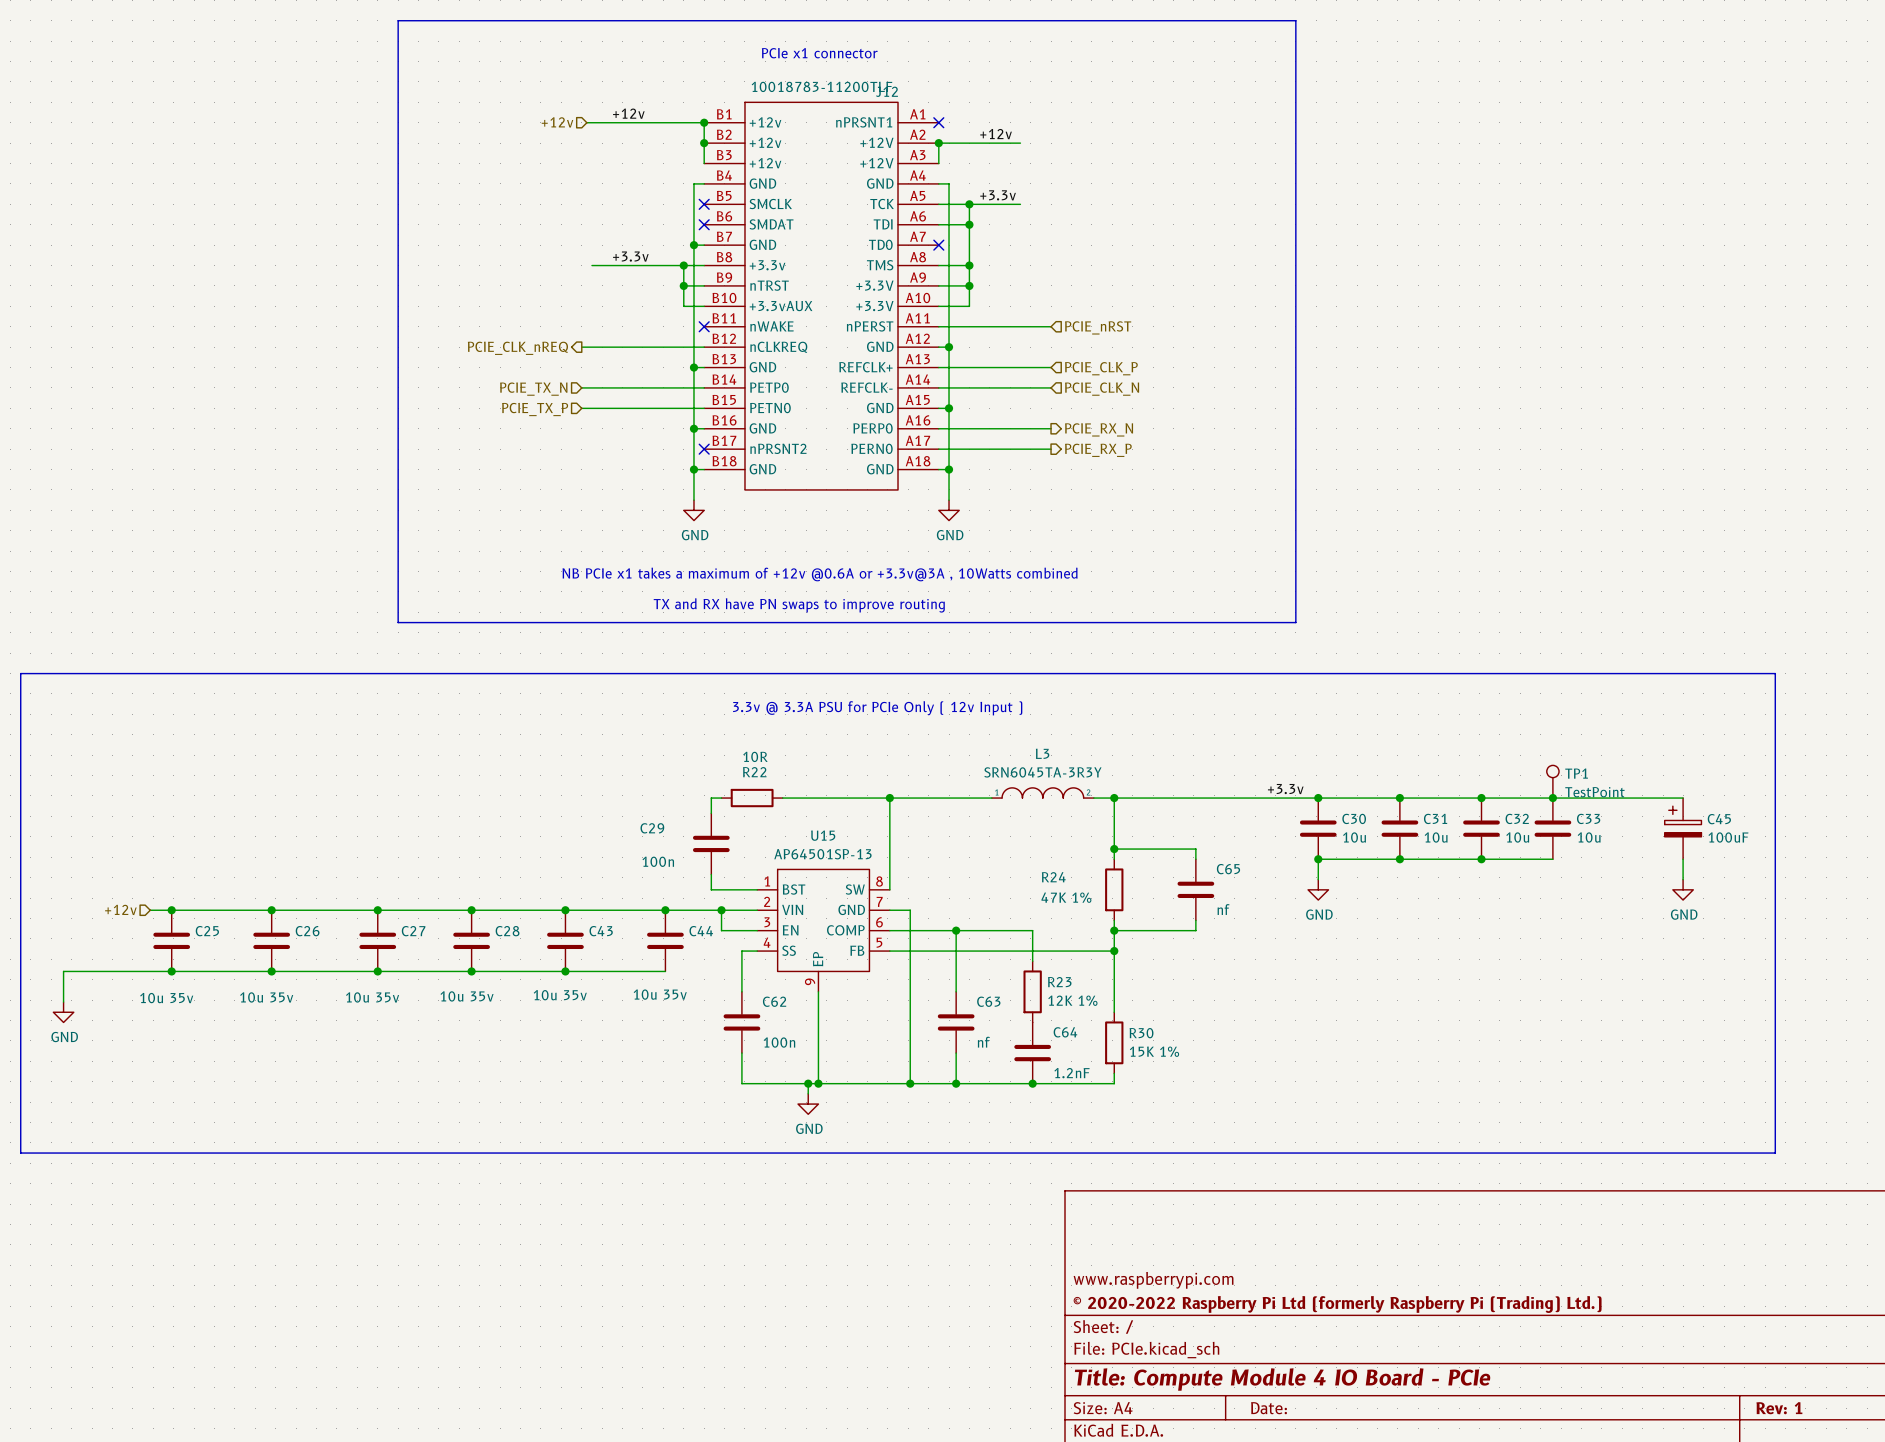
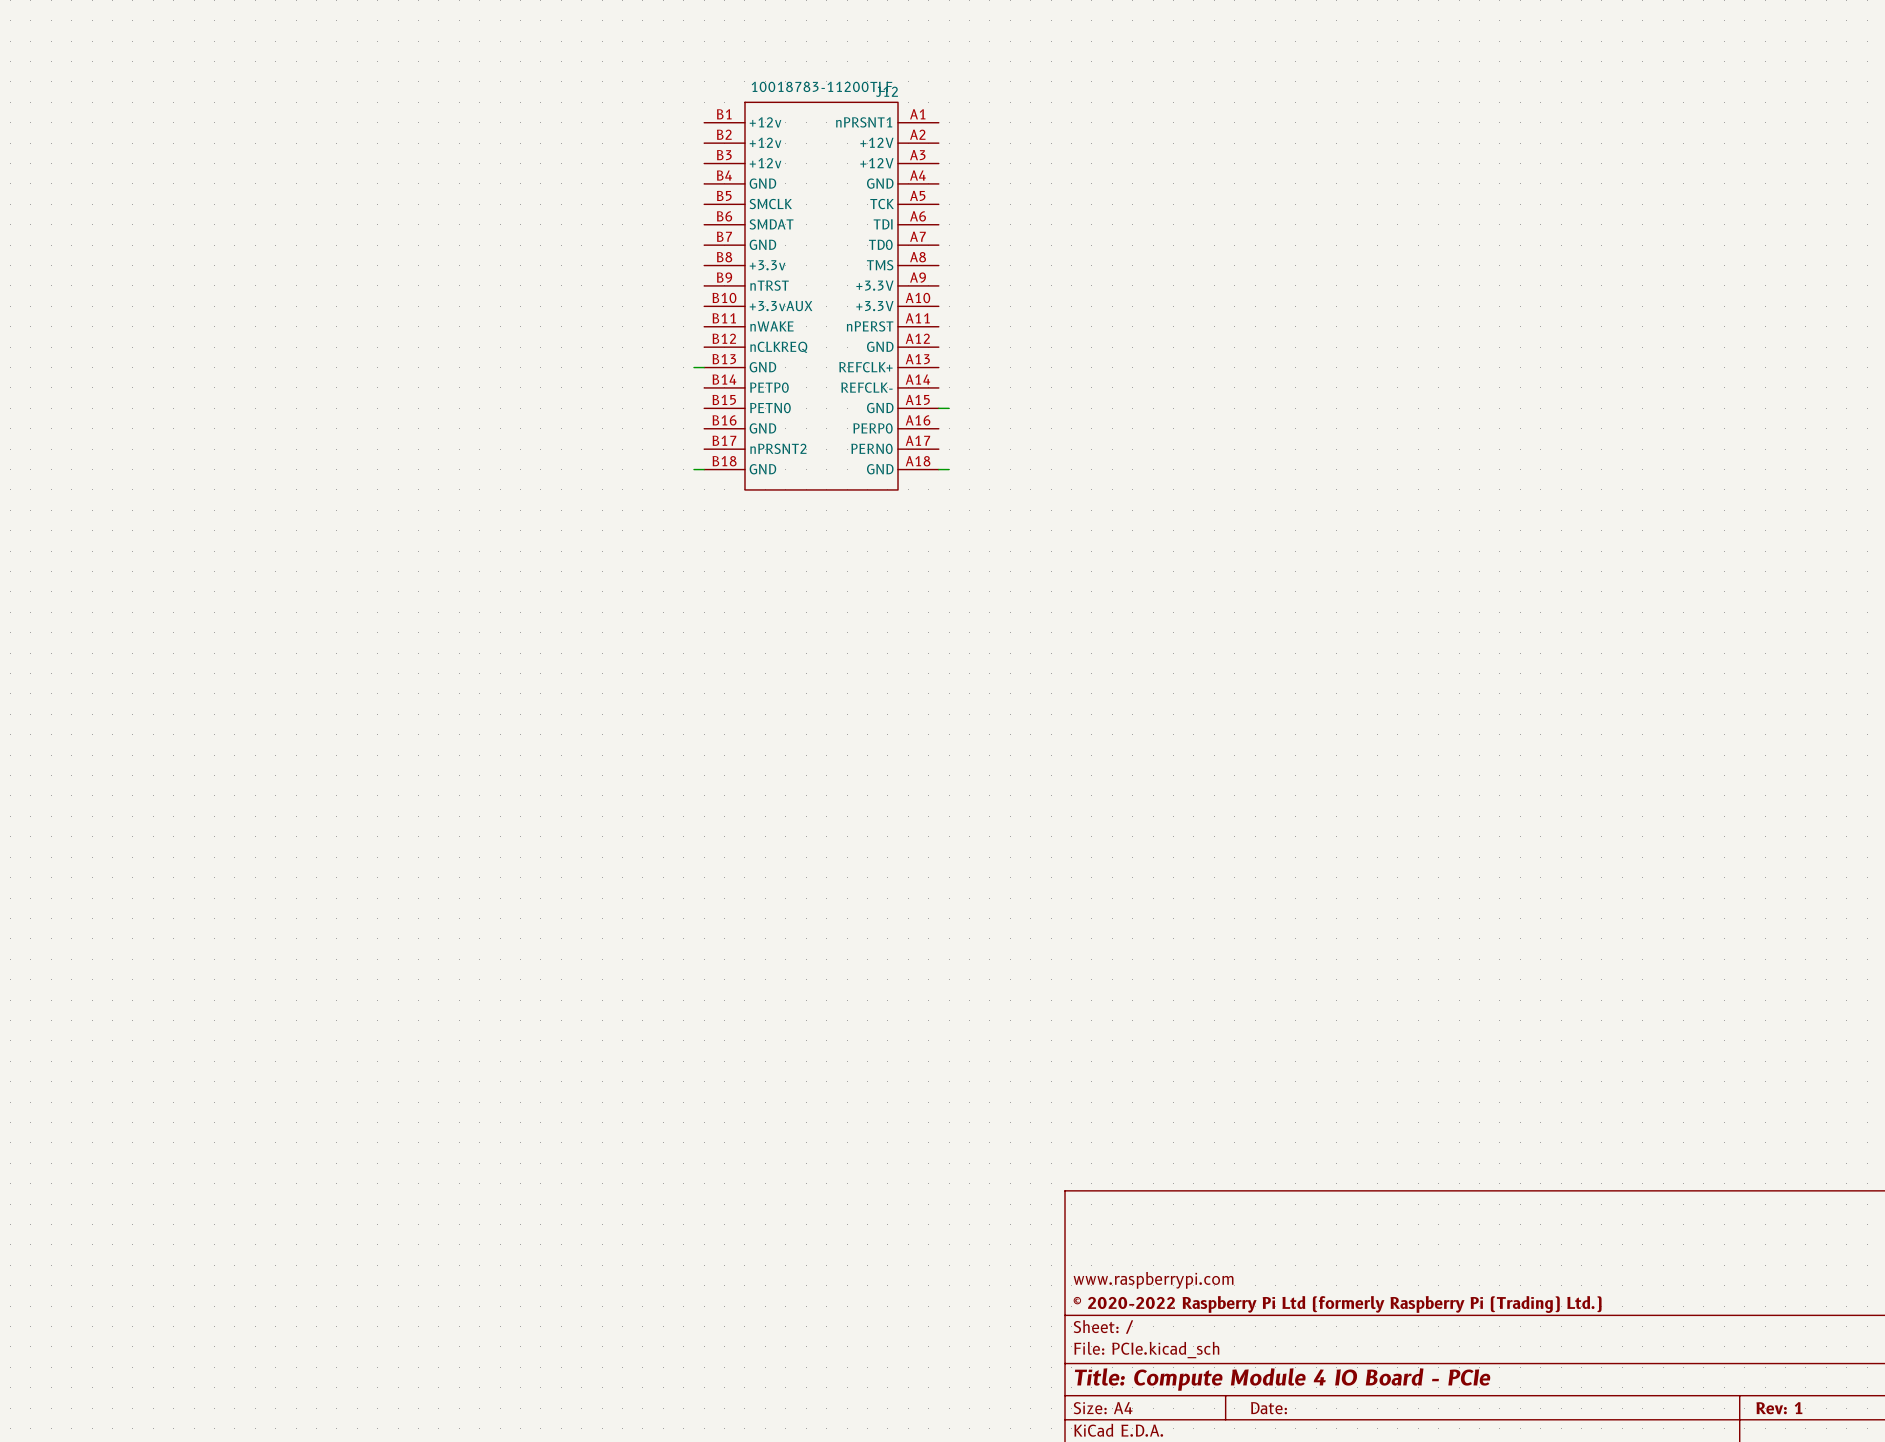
line: (398, 20) (398, 622) (1295, 622) (1295, 20) (398, 20) -> none
text: PCIe x1 connector (819, 53) -> none
label: +12v (628, 113) -> none
hierarchical label: +12v (557, 122) -> none
wire: (586, 122) (704, 122) (704, 163) -> none
junction: (704, 122) -> none
no-connect mark: (938, 122) -> none
label: +12v (996, 134) -> none
junction: (704, 143) -> none
junction: (938, 143) -> none
wire: (1020, 143) (938, 143) (938, 163) -> none
wire: (704, 183) (693, 183) (693, 500) -> none
wire: (938, 183) (949, 183) (949, 500) -> none
label: +3.3v (998, 195) -> none
no-connect mark: (704, 204) -> none
wire: (938, 204) (1020, 204) -> none
wire: (969, 204) (969, 306) (938, 306) -> none
junction: (969, 204) -> none
no-connect mark: (704, 224) -> none
wire: (938, 224) (969, 224) -> none
junction: (969, 224) -> none
wire: (693, 245) (704, 245) -> none
junction: (693, 245) -> none
no-connect mark: (938, 245) -> none
label: +3.3v (630, 256) -> none
wire: (591, 265) (704, 265) -> none
wire: (683, 265) (683, 306) (704, 306) -> none
junction: (683, 265) -> none
wire: (938, 265) (969, 265) -> none
junction: (969, 265) -> none
wire: (683, 285) (704, 285) -> none
junction: (683, 285) -> none
wire: (938, 285) (969, 285) -> none
junction: (969, 285) -> none
no-connect mark: (704, 326) -> none
wire: (938, 326) (1051, 326) -> none
hierarchical label: PCIE_nRST (1098, 327) -> none
wire: (581, 347) (704, 347) -> none
wire: (938, 347) (949, 347) -> none
junction: (949, 347) -> none
hierarchical label: PCIE_CLK_nREQ (517, 348) -> none
junction: (693, 367) -> none
wire: (938, 367) (1051, 367) -> none
hierarchical label: PCIE_CLK_P (1101, 368) -> none
wire: (581, 387) (704, 387) -> none
wire: (938, 387) (1051, 387) -> none
hierarchical label: PCIE_TX_N (533, 389) -> none
hierarchical label: PCIE_CLK_N (1102, 389) -> none
wire: (581, 408) (704, 408) -> none
junction: (949, 408) -> none
hierarchical label: PCIE_TX_P (535, 409) -> none
wire: (693, 428) (704, 428) -> none
junction: (693, 428) -> none
wire: (938, 428) (1051, 428) -> none
hierarchical label: PCIE_RX_N (1099, 429) -> none
no-connect mark: (704, 449) -> none
wire: (938, 449) (1051, 449) -> none
hierarchical label: PCIE_RX_P (1098, 450) -> none
junction: (693, 469) -> none
junction: (949, 469) -> none
power symbol: GND (693, 510) -> none
power symbol: GND (949, 510) -> none
text: NB PCIe x1 takes a maximum of +12v @0.6A or +3.3v@3A , 10Watts combined (820, 574) -> none
text: TX and RX have PN swaps to improve routing (799, 605) -> none
line: (20, 673) (1775, 673) (1775, 1153) (20, 1153) (20, 673) -> none
text: 3.3v @ 3.3A PSU for PCIe Only ( 12v Input ) (877, 708) -> none
TP1: TestPoint (1552, 781) -> none
label: +3.3v (1285, 789) -> none
L3: SRN6045TA-3R3Y (1042, 792) -> none
wire: (721, 798) (711, 798) (711, 813) -> none
R22: 10R (752, 798) -> none
wire: (782, 798) (991, 798) -> none
wire: (889, 798) (889, 889) -> none
junction: (889, 798) -> none
wire: (1093, 798) (1683, 798) -> none
wire: (1114, 798) (1114, 859) -> none
junction: (1114, 798) -> none
junction: (1318, 798) -> none
junction: (1399, 798) -> none
junction: (1481, 798) -> none
junction: (1552, 798) -> none
C30: 10u (1318, 828) -> none
C31: 10u (1399, 828) -> none
C32: 10u (1481, 828) -> none
C33: 10u (1552, 828) -> none
C45: 100uF (1683, 828) -> none
C29: 100n (711, 843) -> none
wire: (1114, 849) (1195, 849) (1195, 859) -> none
junction: (1114, 849) -> none
junction: (1318, 859) -> none
junction: (1399, 859) -> none
junction: (1481, 859) -> none
wire: (1552, 859) (1318, 859) (1318, 879) -> none
wire: (1683, 859) (1683, 879) -> none
wire: (711, 874) (711, 889) (757, 889) -> none
R24: 47K 1% (1114, 889) -> none
C65: nf (1195, 889) -> none
power symbol: GND (1318, 889) -> none
power symbol: GND (1683, 889) -> none
hierarchical label: +12v (120, 909) -> none
wire: (150, 910) (757, 910) -> none
junction: (171, 910) -> none
junction: (271, 910) -> none
junction: (377, 910) -> none
junction: (471, 910) -> none
junction: (565, 910) -> none
junction: (665, 910) -> none
wire: (721, 910) (721, 930) (757, 930) -> none
junction: (721, 910) -> none
wire: (889, 910) (910, 910) (910, 1083) -> none
wire: (1114, 920) (1114, 1012) -> none
wire: (1195, 920) (1195, 930) (1114, 930) -> none
U15: AP64501SP-13 (823, 930) -> none
wire: (889, 930) (1032, 930) (1032, 961) -> none
wire: (956, 930) (956, 991) -> none
junction: (956, 930) -> none
junction: (1114, 930) -> none
C25: 10u 35v (171, 940) -> none
C26: 10u 35v (271, 940) -> none
C27: 10u 35v (377, 940) -> none
C28: 10u 35v (471, 940) -> none
C43: 10u 35v (565, 940) -> none
C44: 10u 35v (665, 940) -> none
wire: (757, 951) (741, 951) (741, 991) -> none
wire: (889, 951) (1114, 951) -> none
junction: (1114, 951) -> none
junction: (171, 971) -> none
junction: (271, 971) -> none
junction: (377, 971) -> none
junction: (471, 971) -> none
junction: (565, 971) -> none
wire: (665, 971) (63, 971) (63, 1002) -> none
wire: (818, 991) (818, 1083) -> none
R23: 12K 1% (1032, 991) -> none
power symbol: GND (63, 1012) -> none
C62: 100n (741, 1022) -> none
C63: nf (956, 1022) -> none
R30: 15K 1% (1114, 1042) -> none
wire: (741, 1053) (741, 1083) (1114, 1083) (1114, 1073) -> none
wire: (956, 1053) (956, 1083) -> none
C64: 1.2nF (1032, 1053) -> none
wire: (808, 1083) (808, 1093) -> none
junction: (808, 1083) -> none
junction: (818, 1083) -> none
junction: (910, 1083) -> none
junction: (956, 1083) -> none
junction: (1032, 1083) -> none
power symbol: GND (808, 1104) -> none

